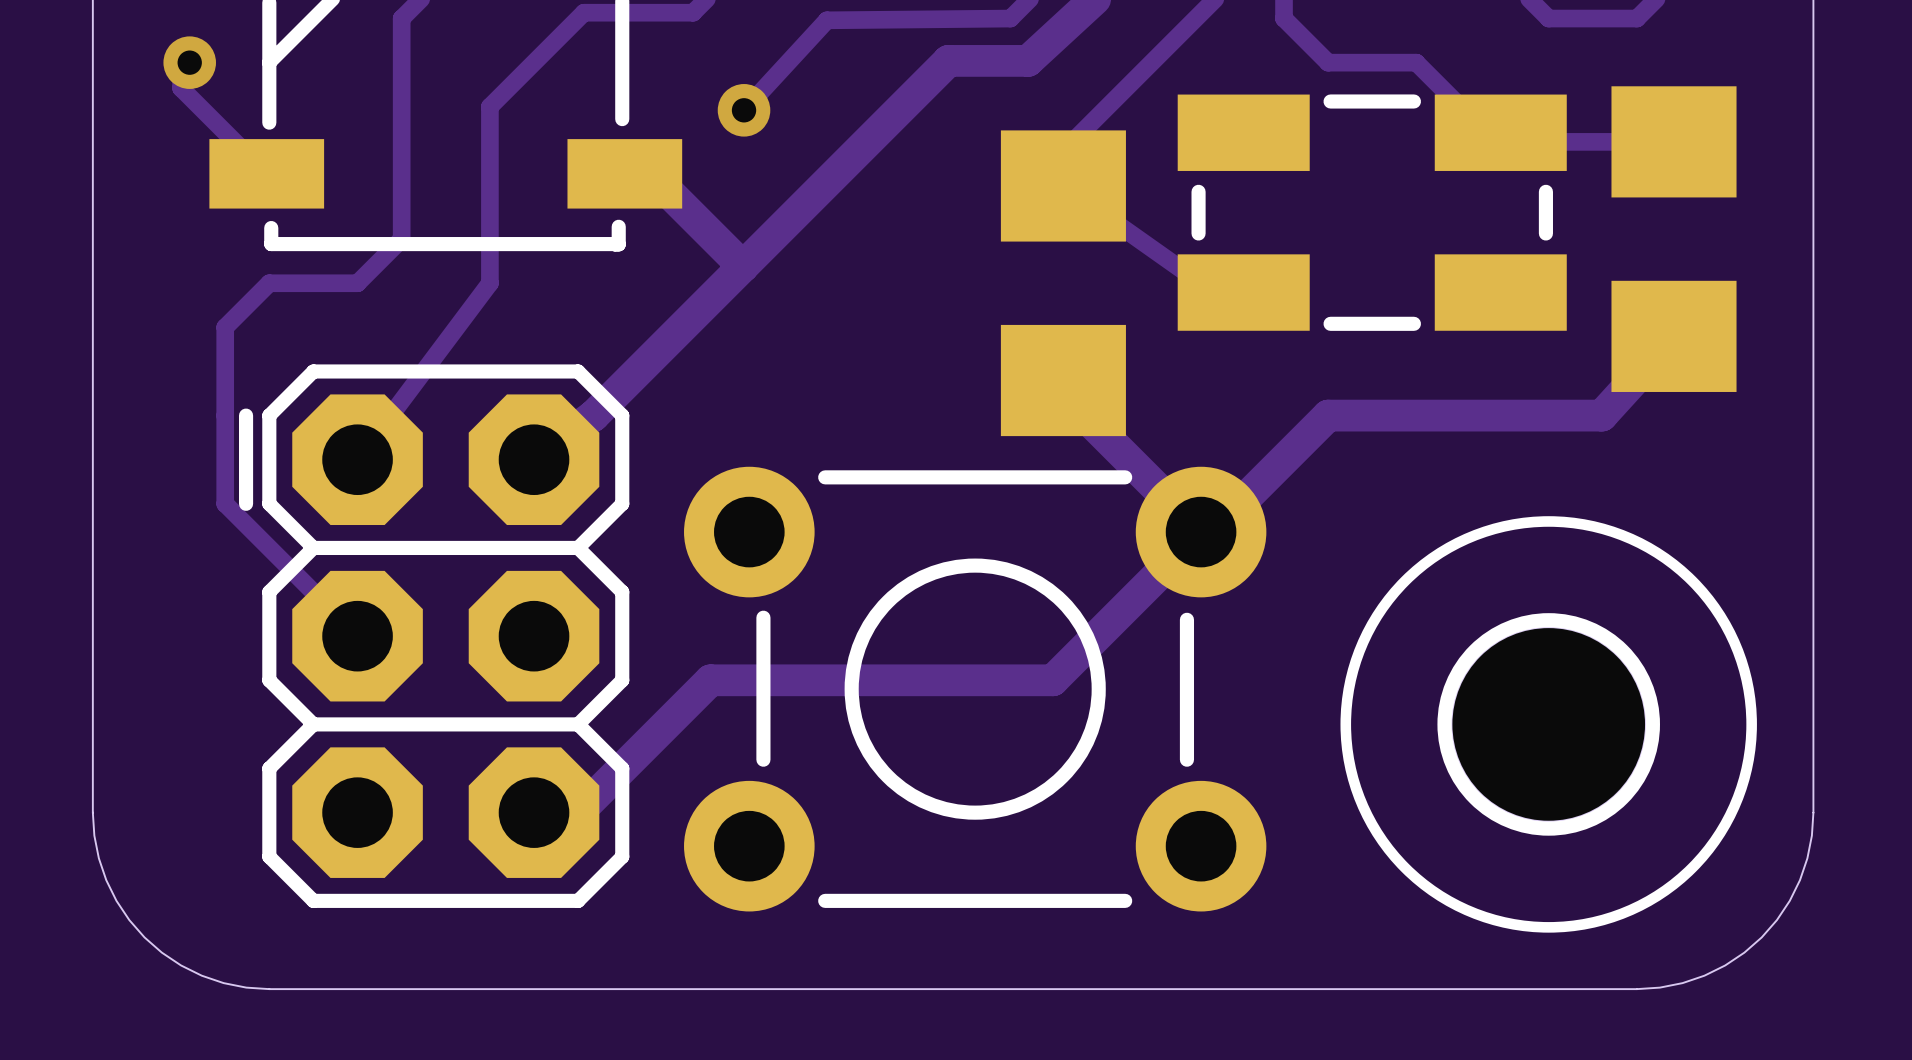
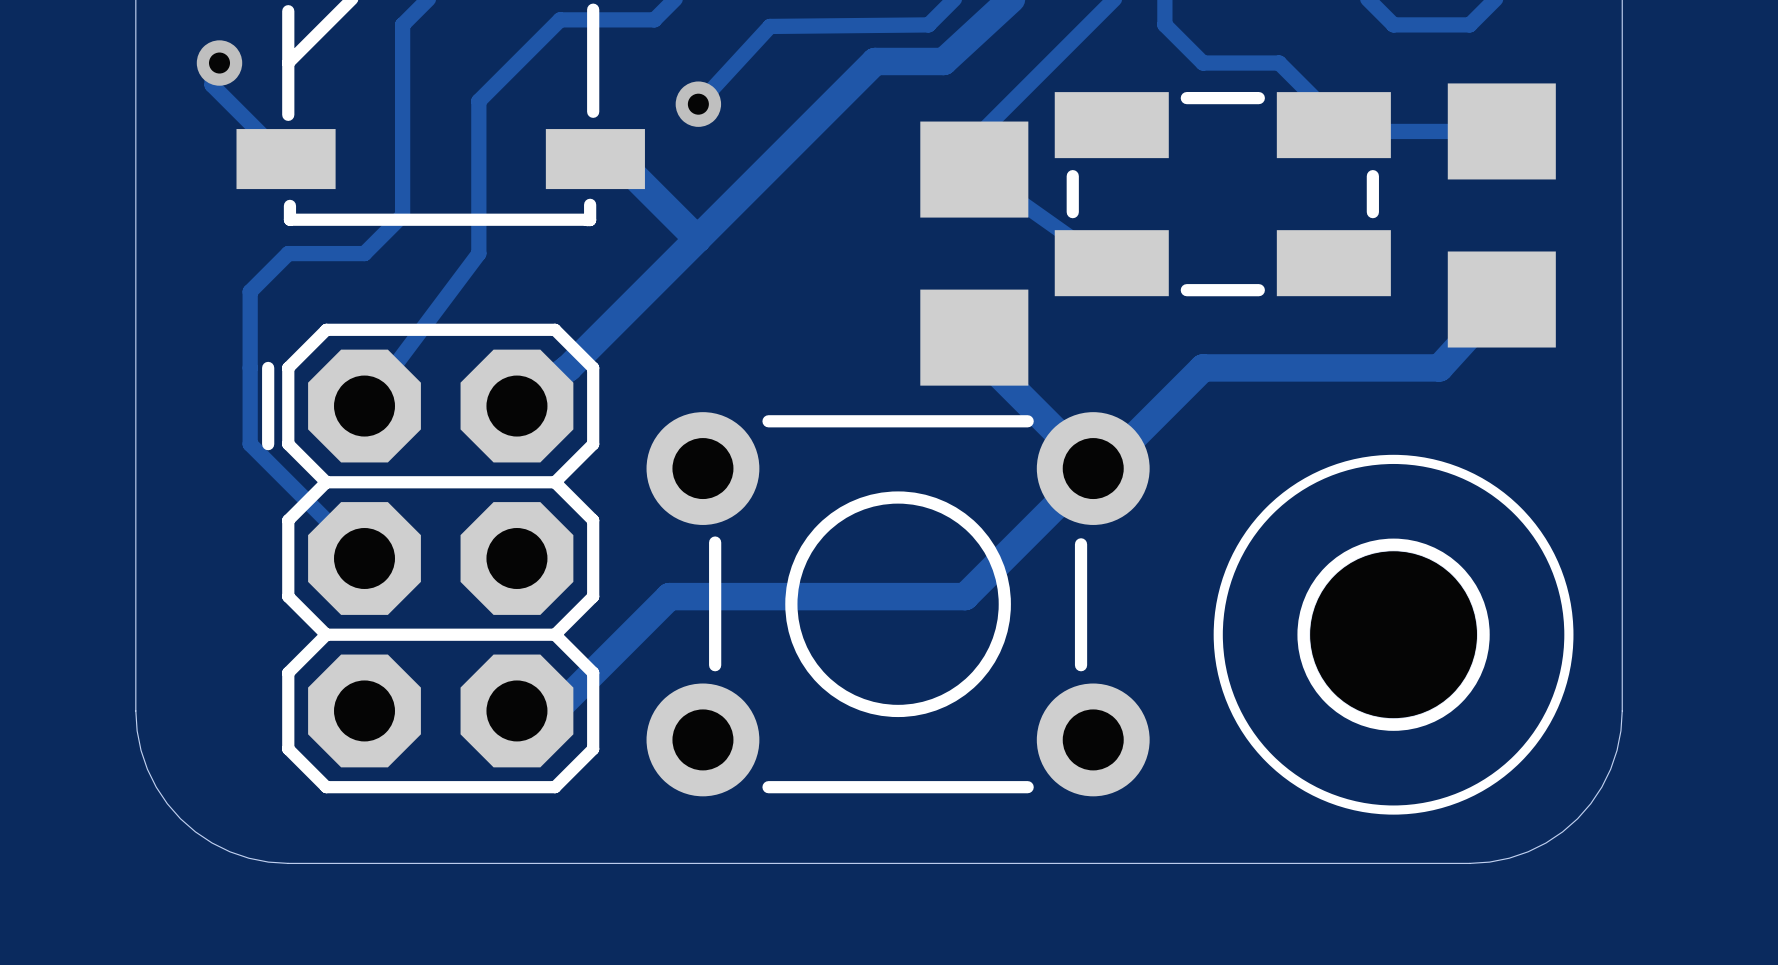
part position: (1372, 212) -> (1222, 194)

